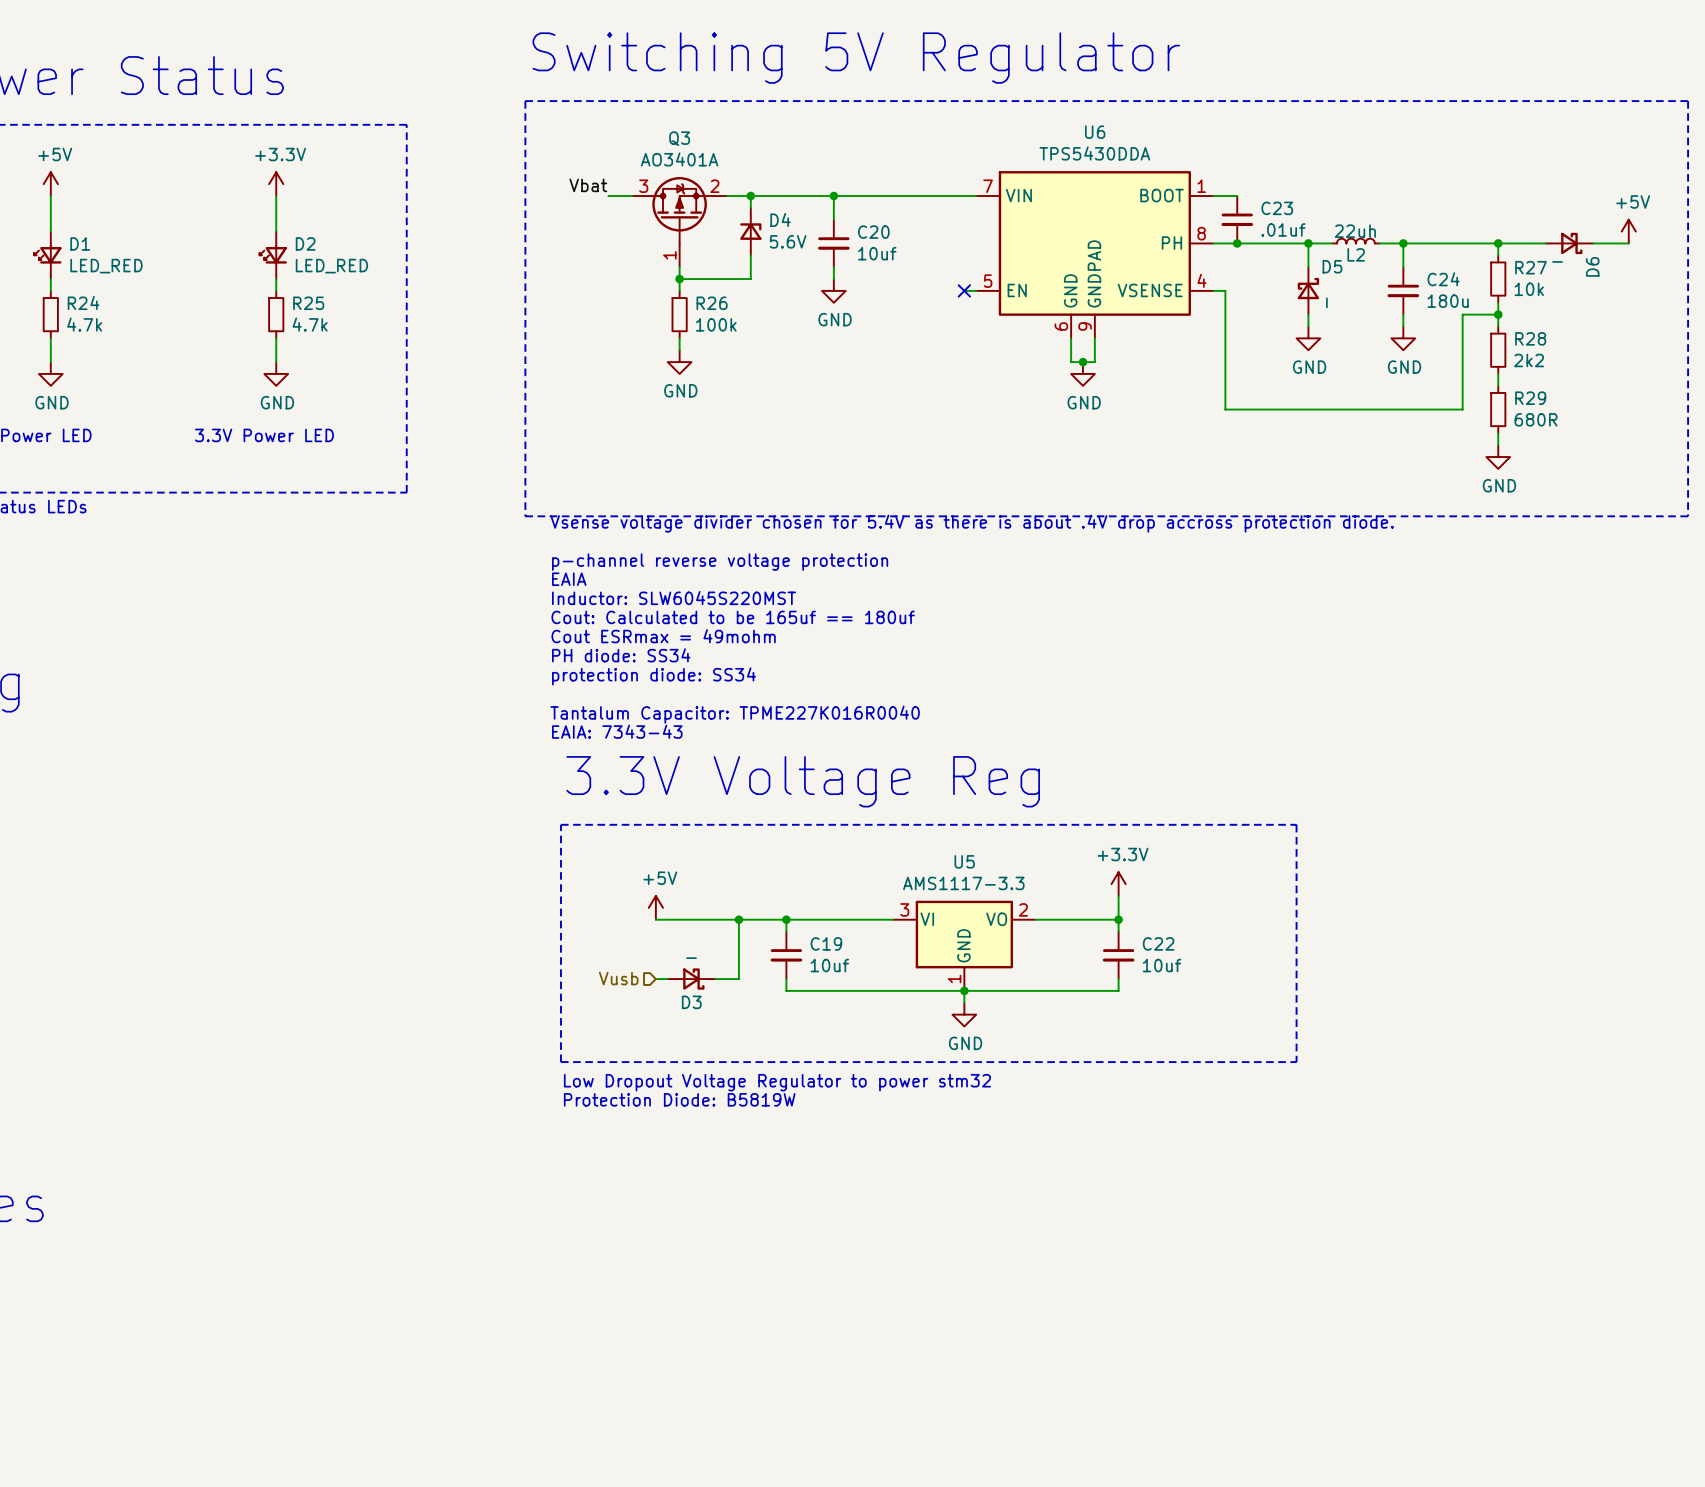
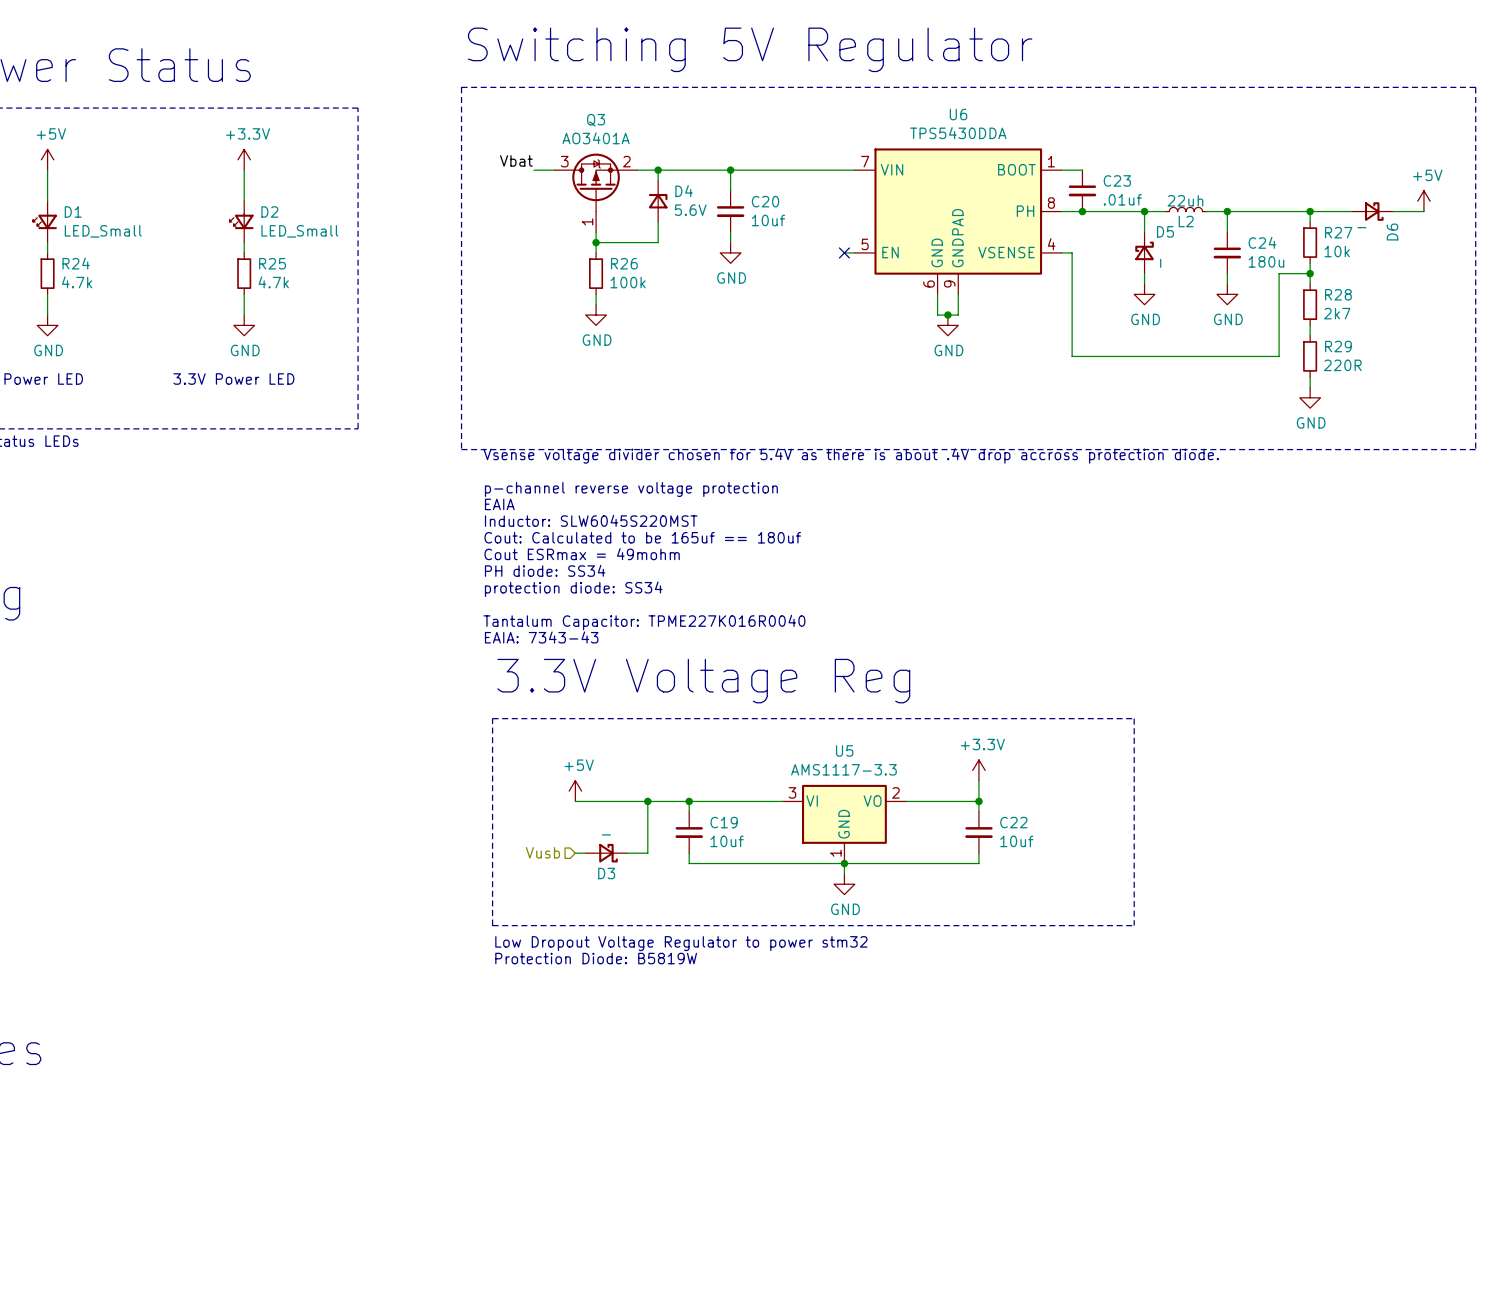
D1 value: LED_RED (106, 266) -> LED_Small (103, 231)
D2 value: LED_RED (331, 266) -> LED_Small (299, 231)
R28 value: 2k2 (1529, 360) -> 2k7 (1337, 313)
R29 value: 680R (1536, 419) -> 220R (1342, 365)

